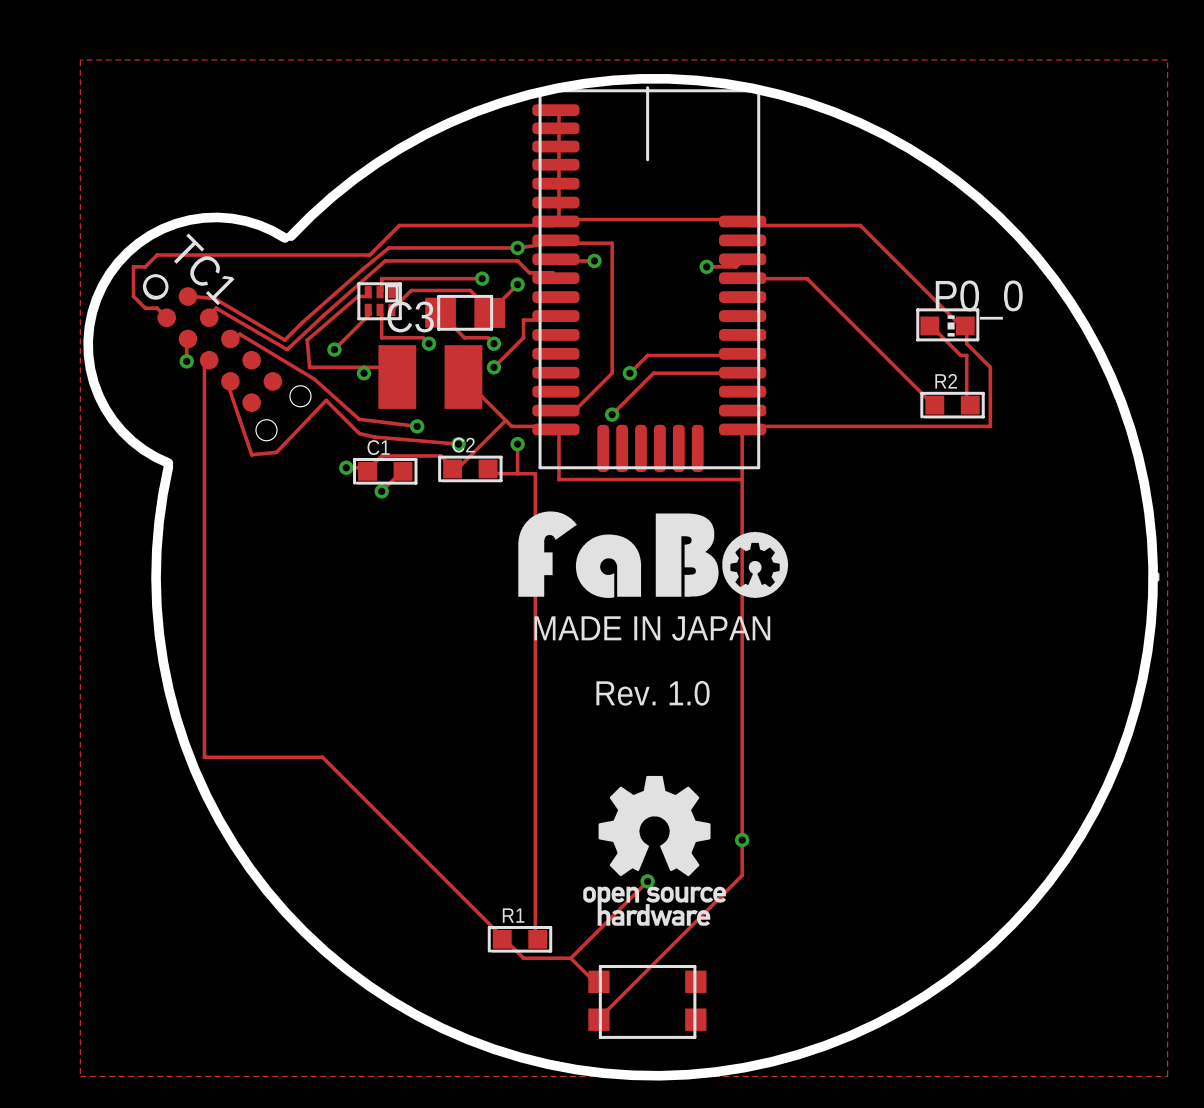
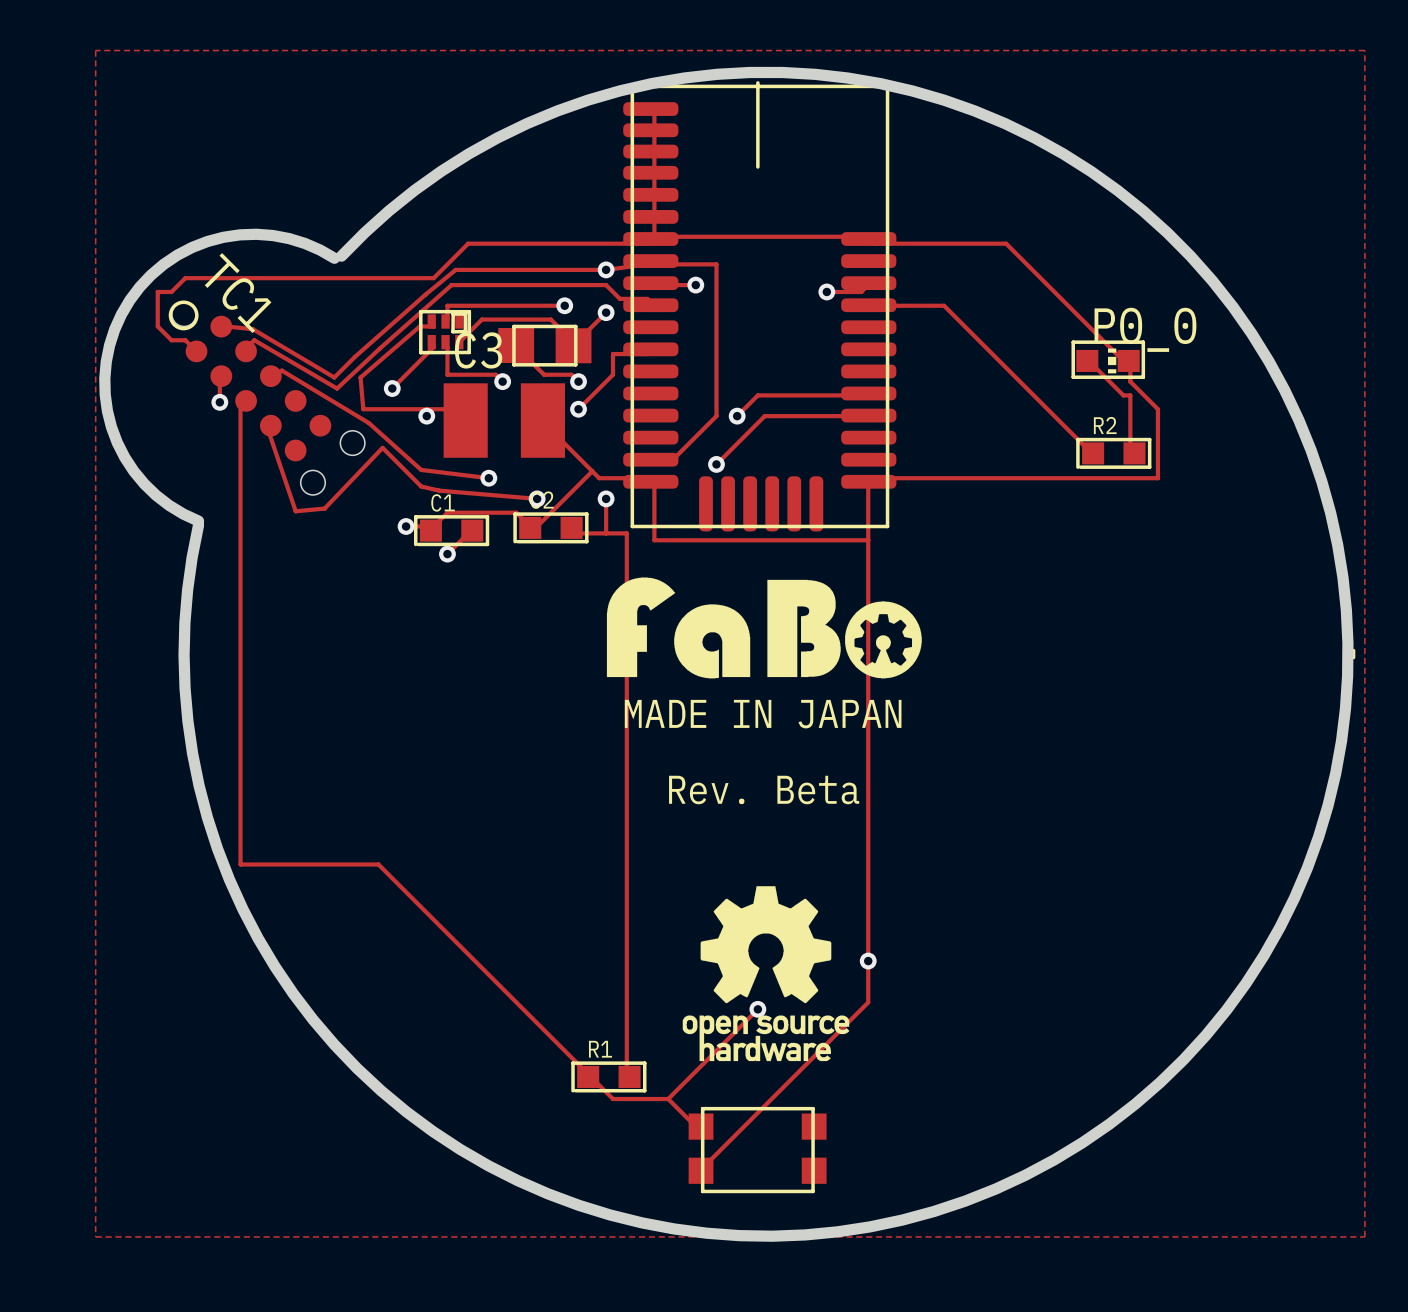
text: Rev. 1.0 (653, 693) -> Rev. Beta (764, 790)

